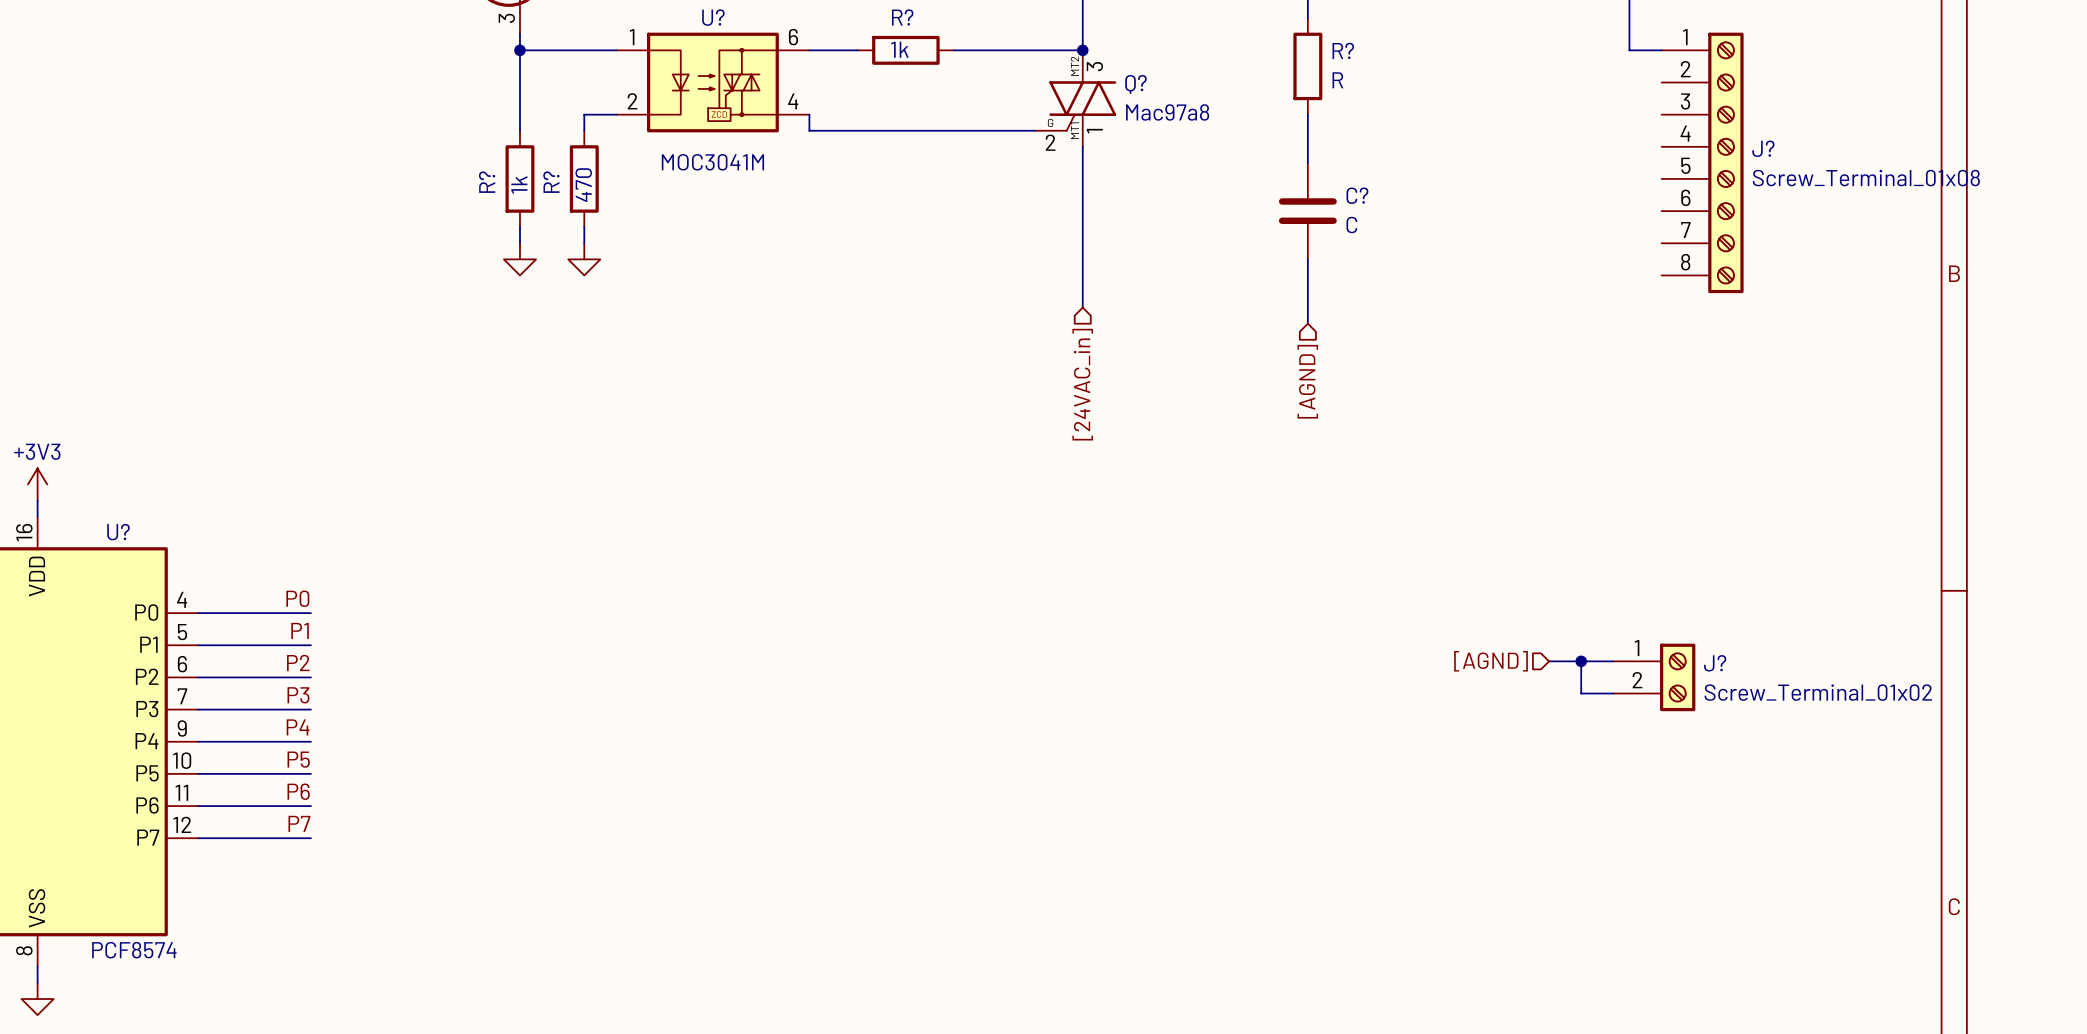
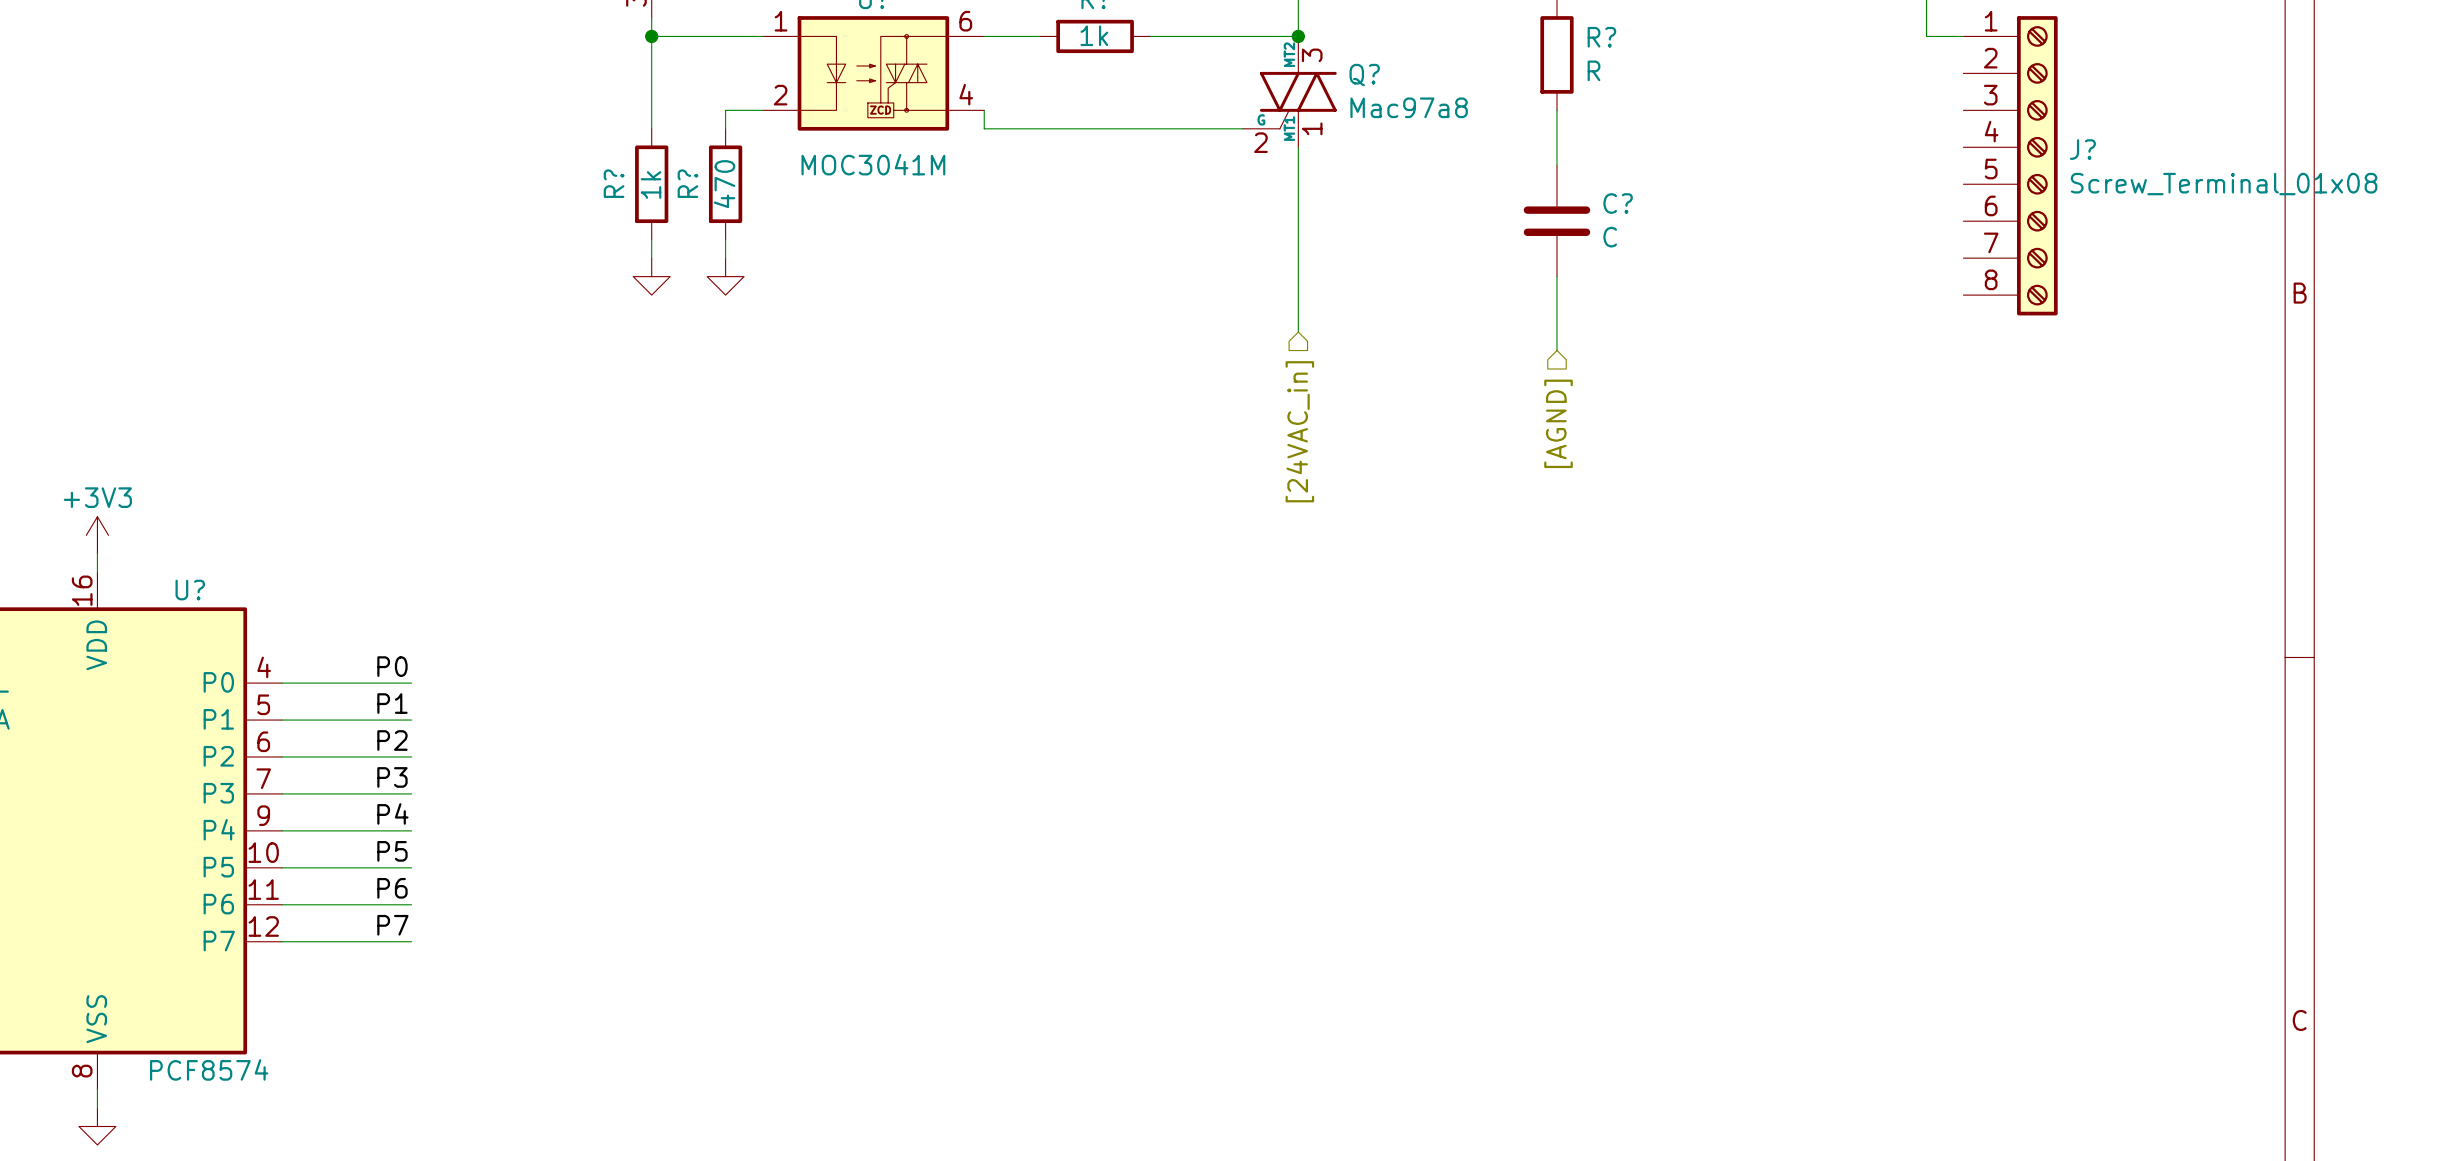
hierarchical label: [AGND] (1491, 661) -> none
wire: (1549, 661) (1613, 661) -> none
wire: (1581, 661) (1581, 693) (1613, 693) -> none
junction: (1581, 661) -> none
J?: Screw_Terminal_01x02 (1654, 677) -> none

